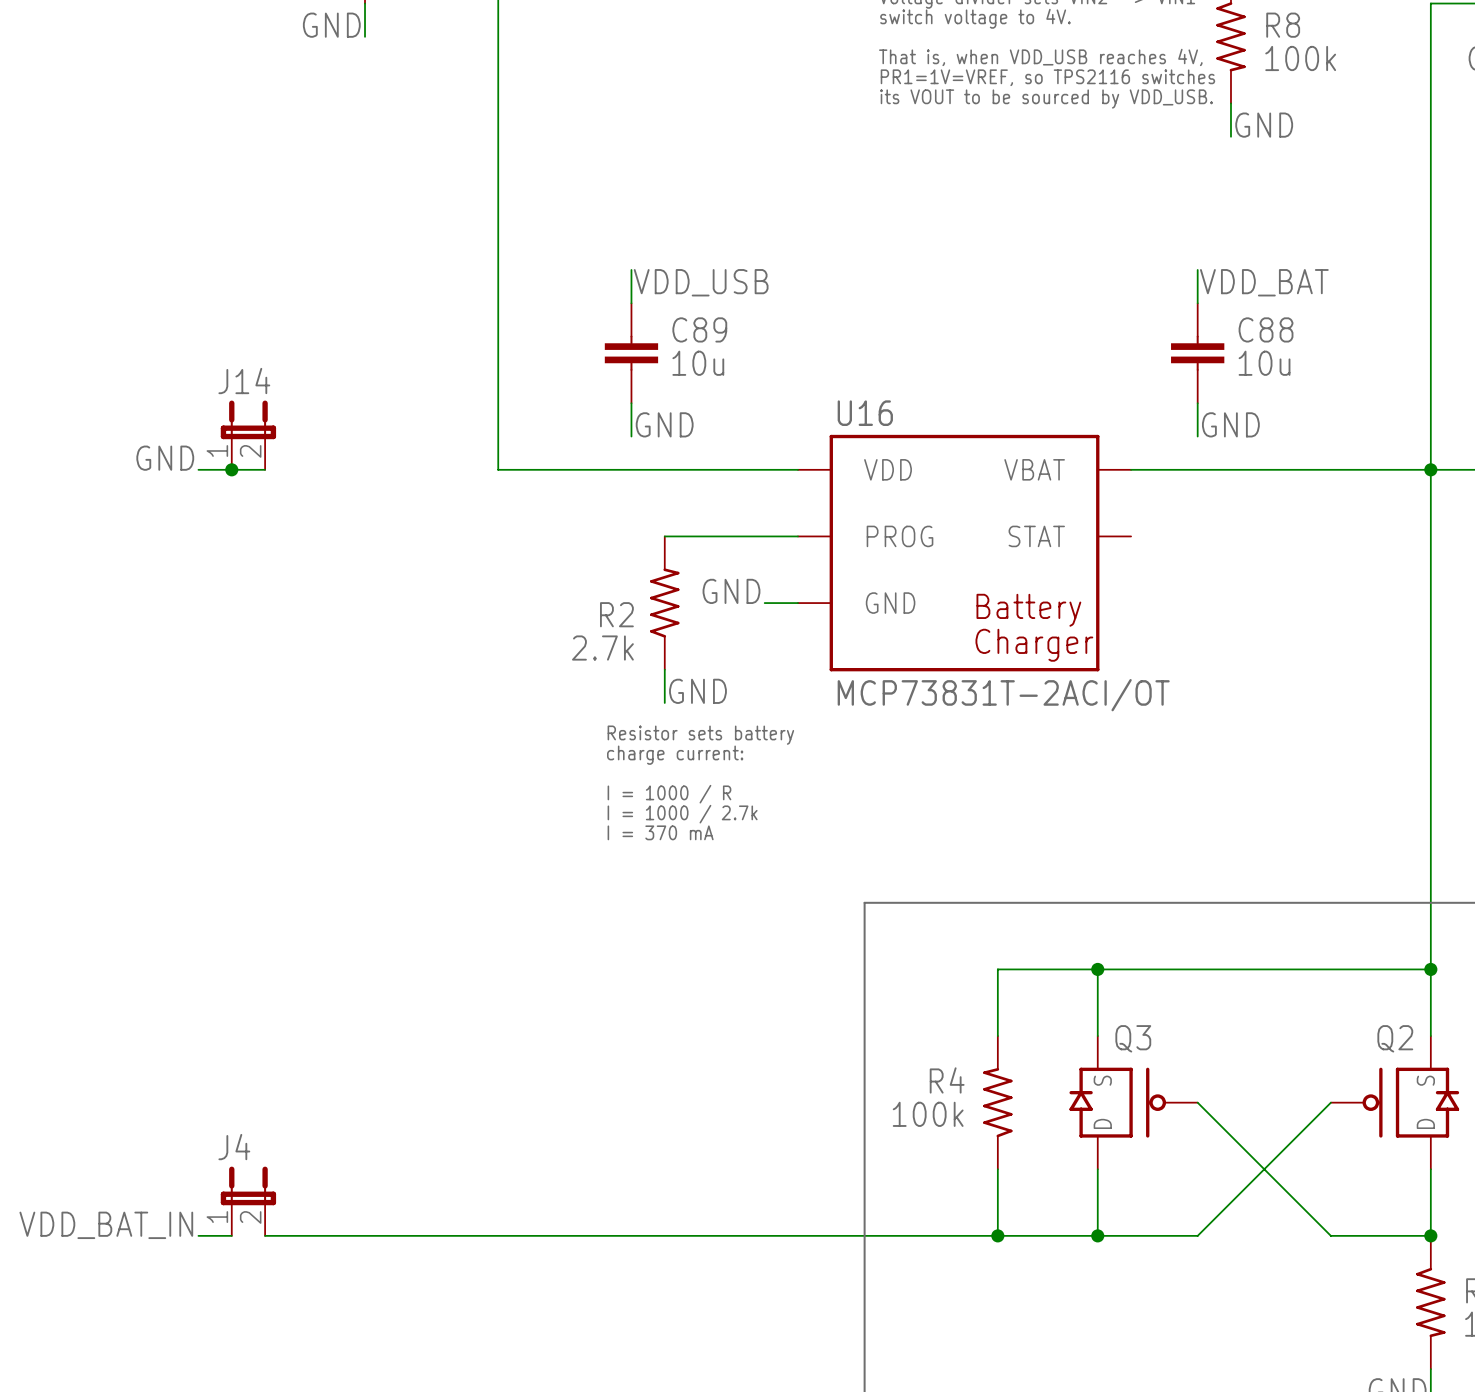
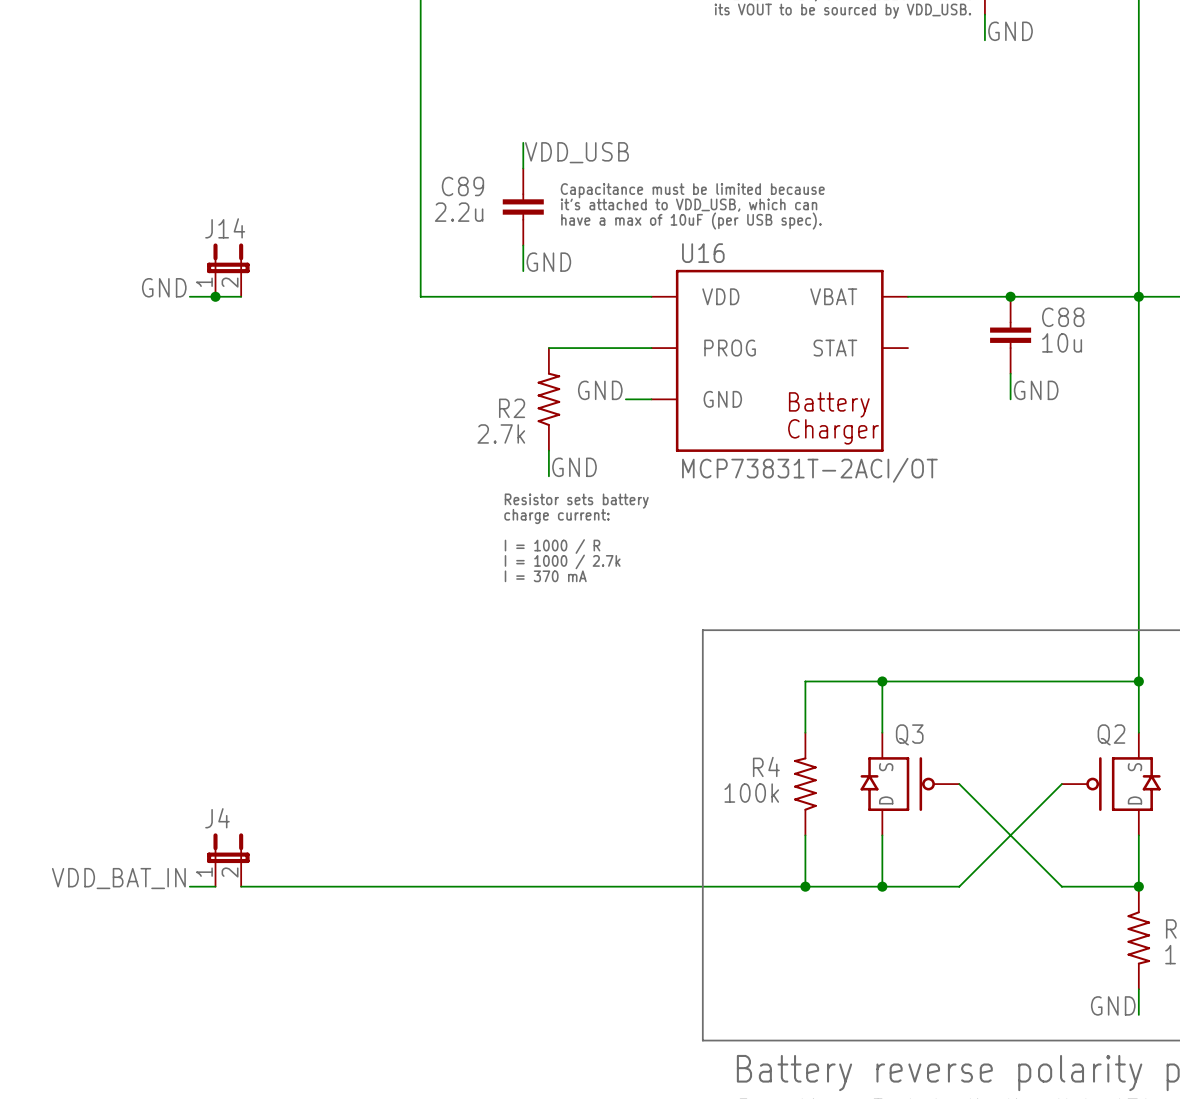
wire: (1197, 269) (1197, 303) -> none
label: VDD_BAT (1264, 282) -> none
C89 name position: C89 (699, 329) -> C89 (462, 186)
text: none -> Capacitance must be limited because (692, 190)
text: none -> it's attached to VDD_USB, which can (688, 205)
C88 position: (1197, 353) -> (1010, 335)
C89 value: 10u (698, 363) -> 2.2u (459, 212)
text: none -> have a max of 10uF (per USB spec). (691, 221)
wire: (1197, 403) (1197, 436) -> (1010, 373) (1010, 399)
label position: GND (1230, 424) -> GND (1036, 390)
junction: none -> (1010, 296)

